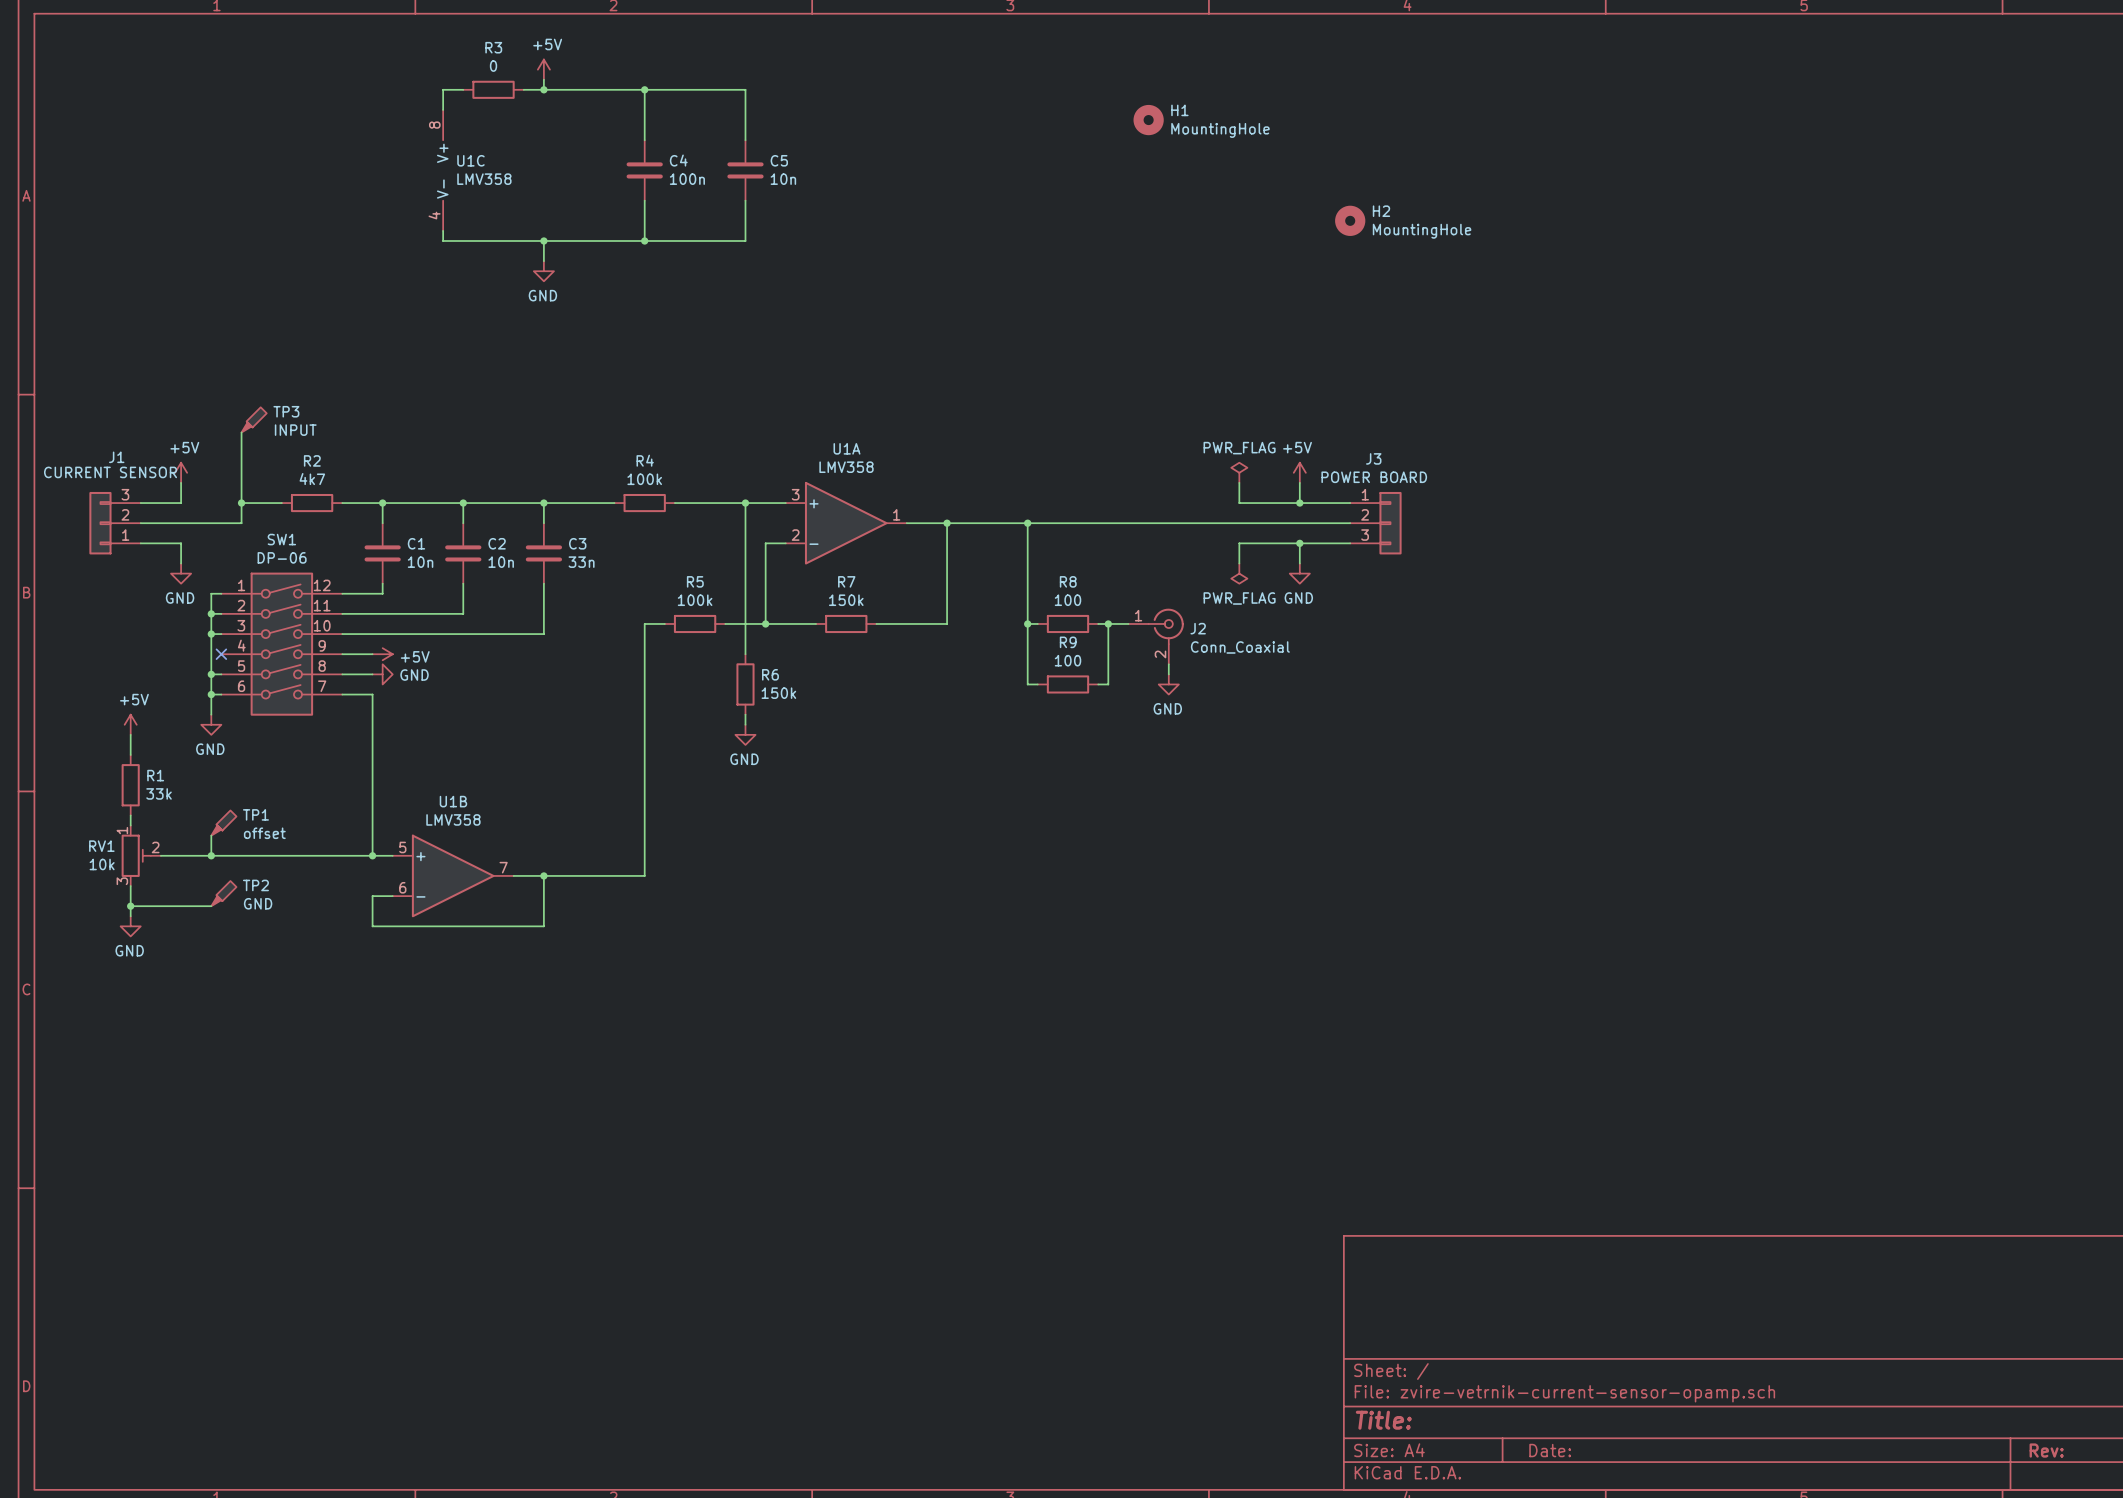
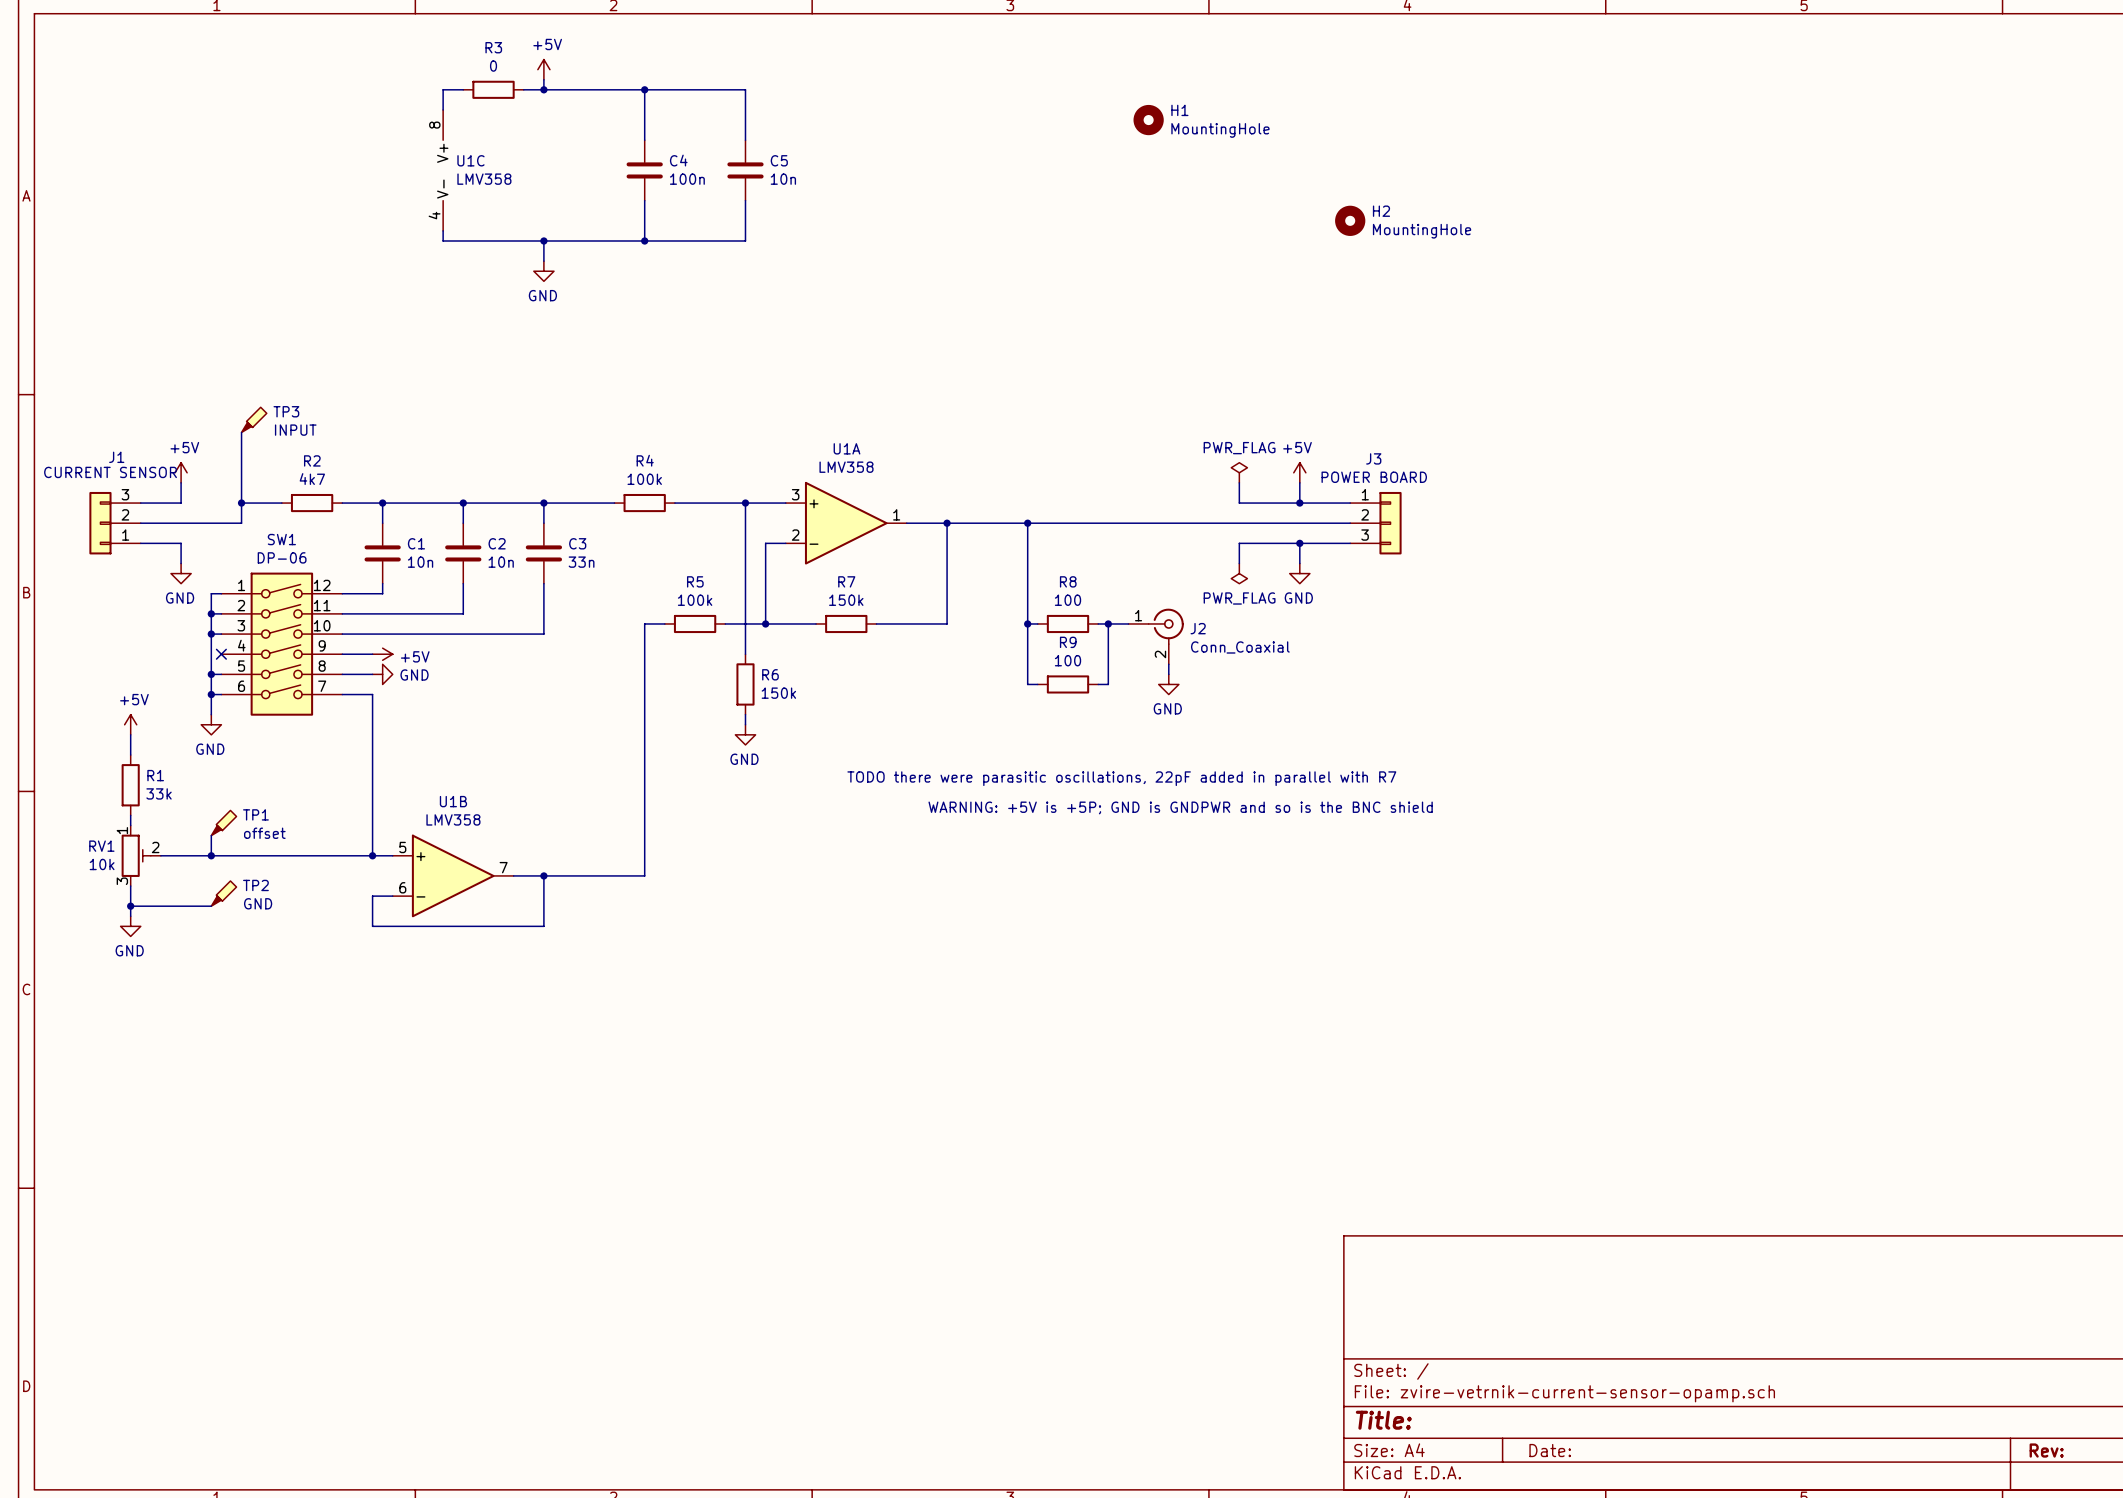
text: none -> TODO there were parasitic oscillations, 22pF added in parallel with R7 (1121, 778)
text: none -> WARNING: +5V is +5P; GND is GNDPWR and so is the BNC shield (1180, 807)

